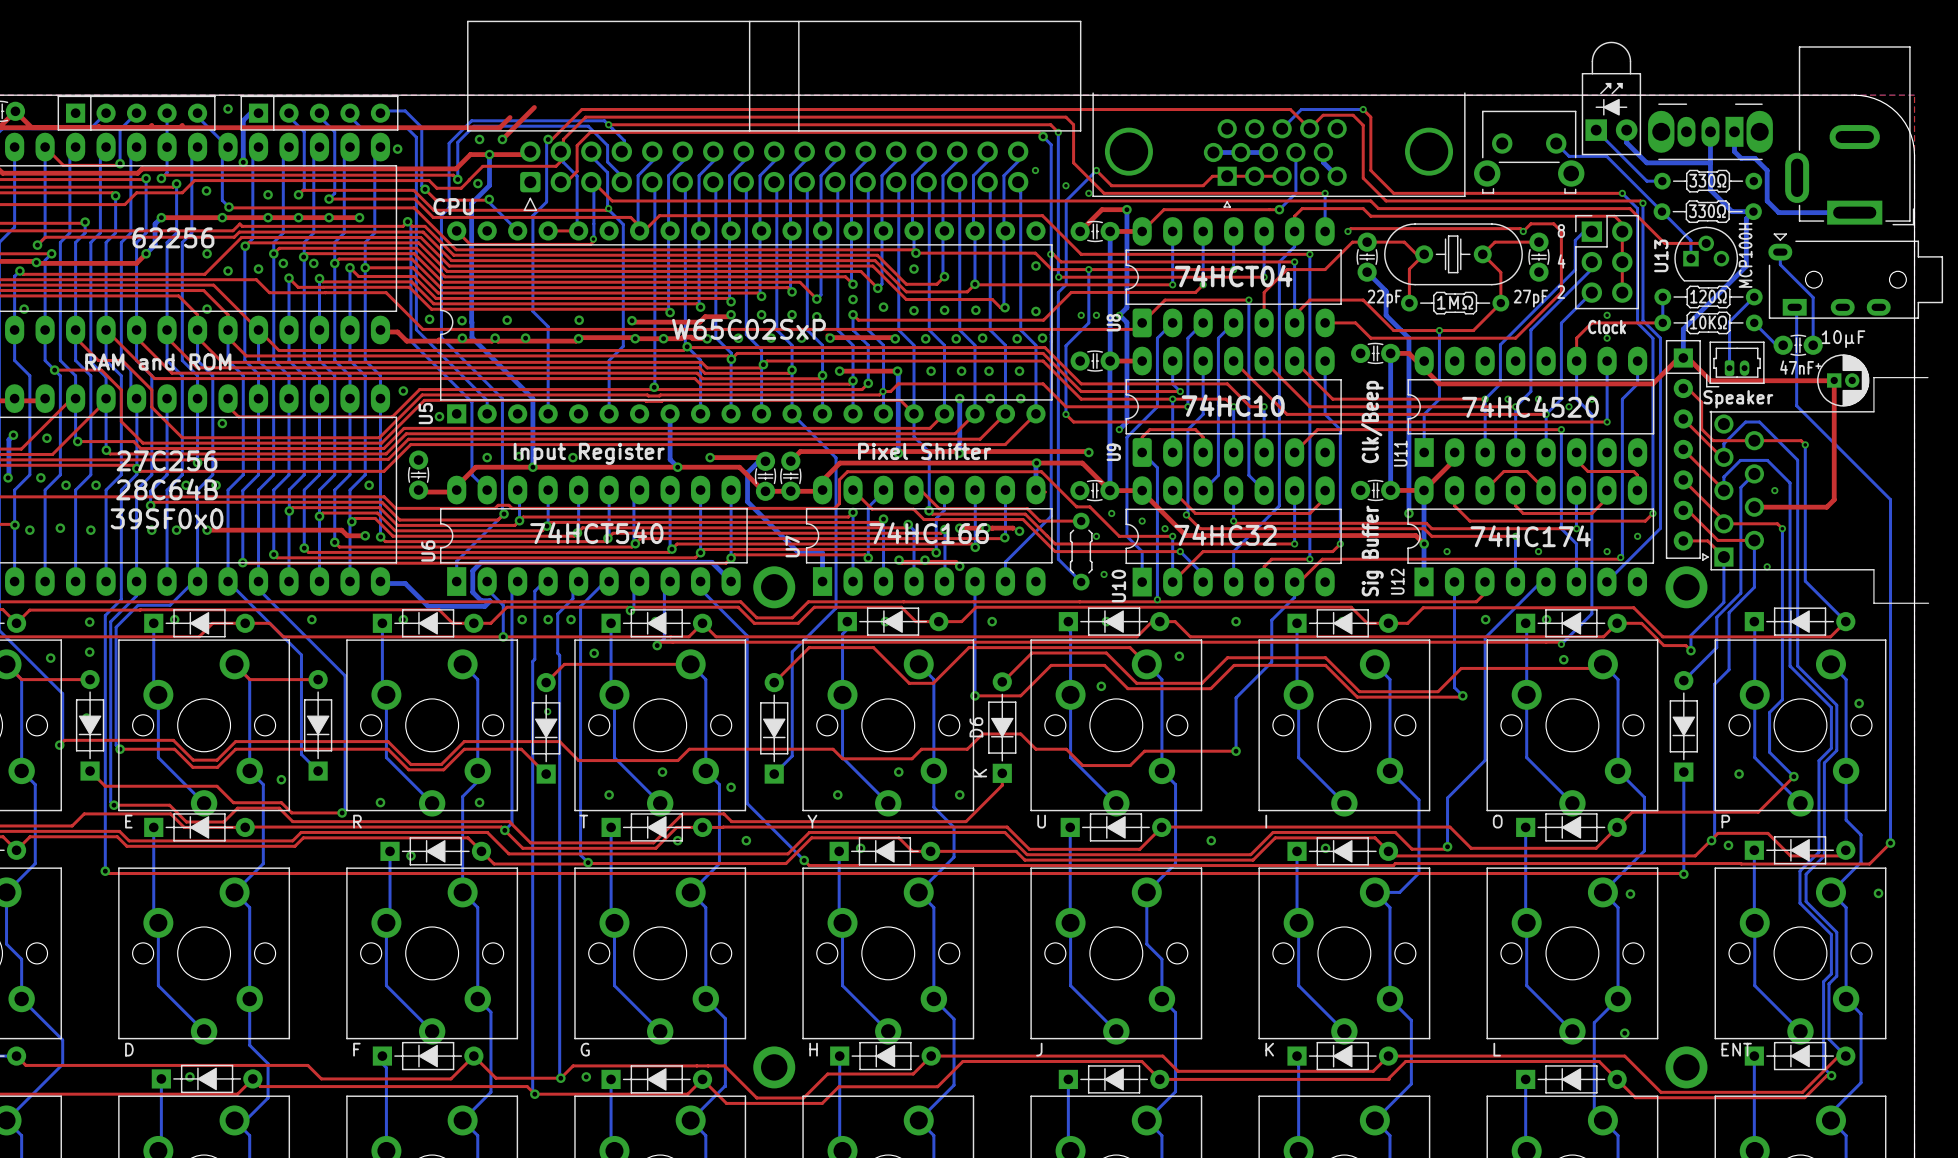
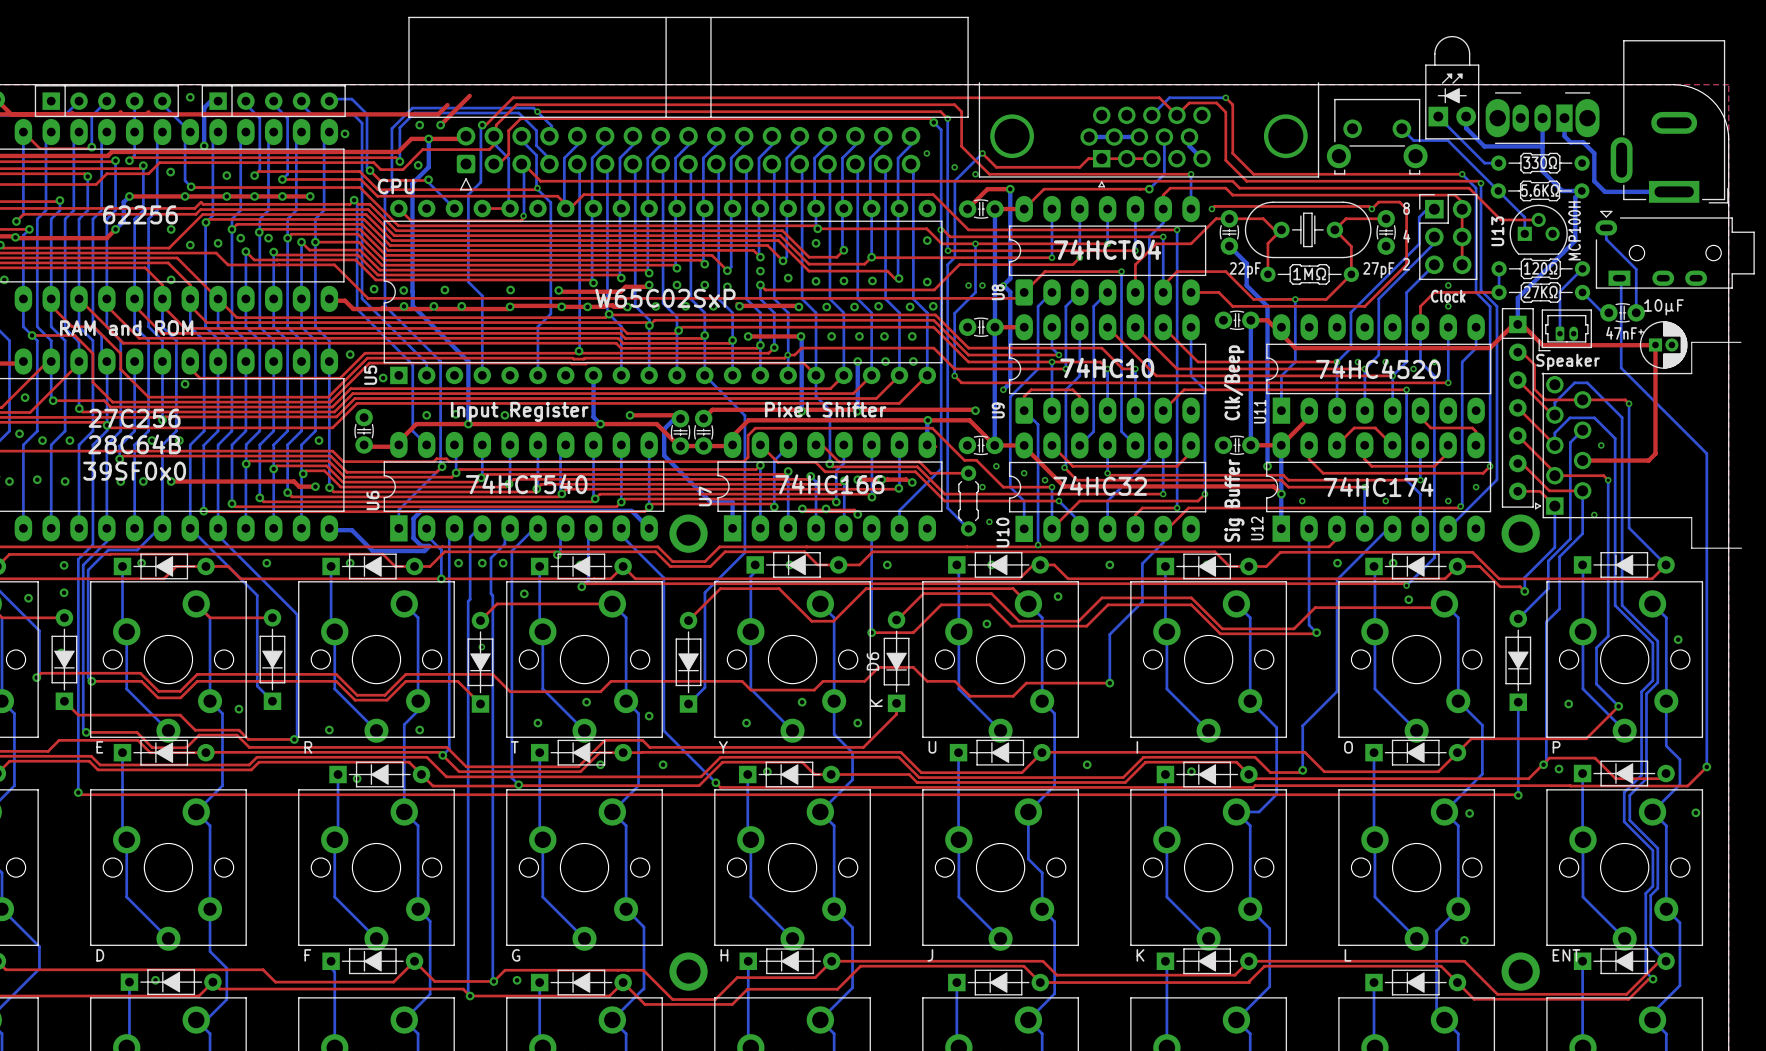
part value: 330Ω (1707, 211) -> 5.6KΩ (1540, 190)
part value: 10KΩ (1708, 322) -> 27KΩ (1540, 292)

